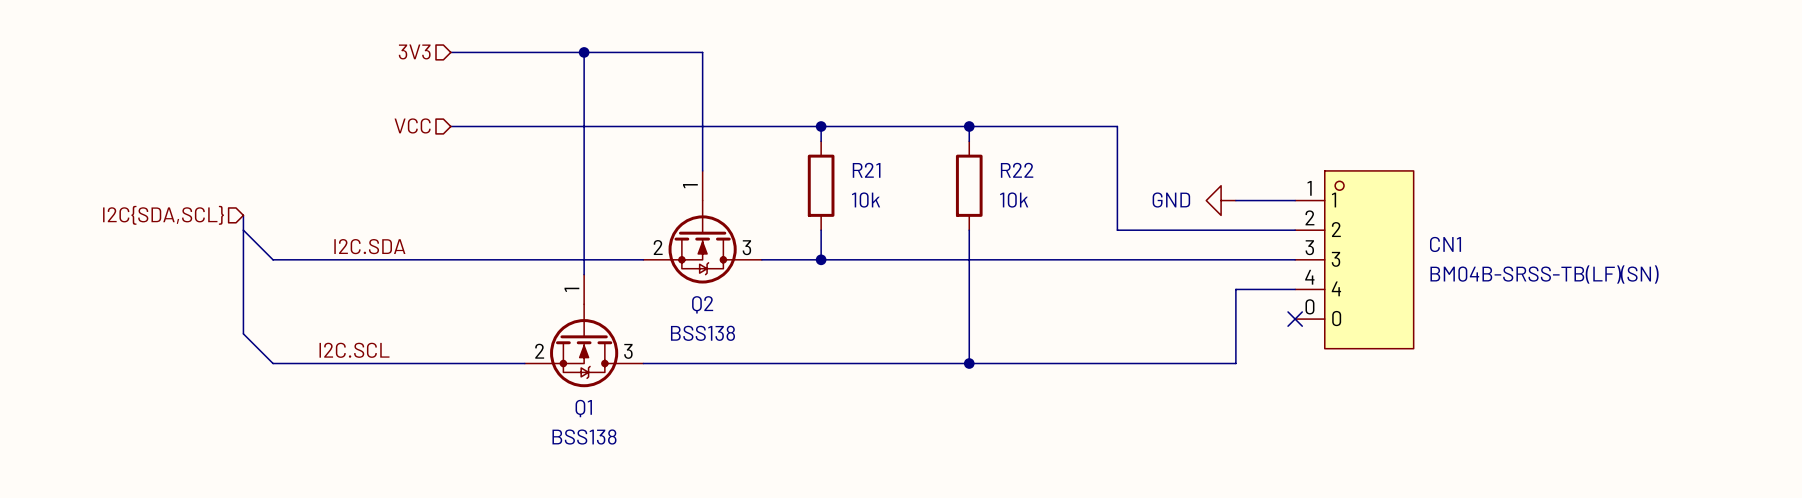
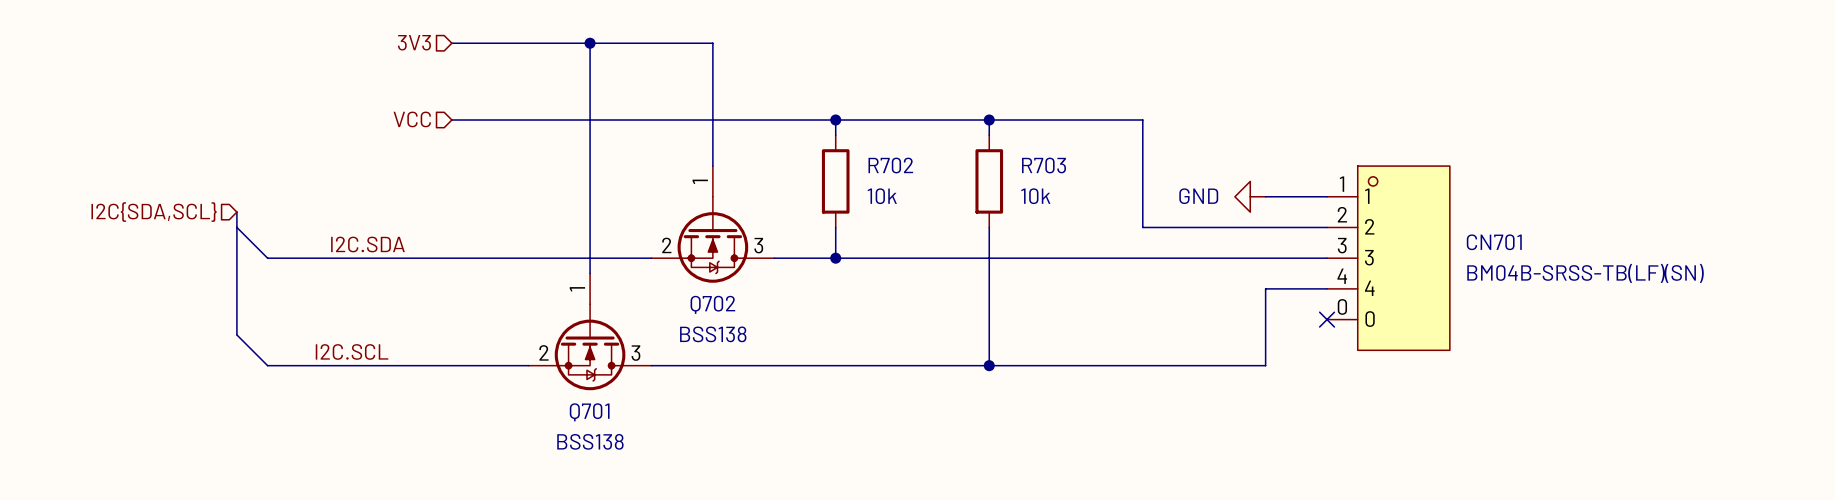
R21 name: R21 (866, 170) -> R702 (890, 165)
R22 name: R22 (1017, 170) -> R703 (1044, 165)
CN1 name: CN1 (1445, 244) -> CN701 (1494, 242)
Q2 name: Q2 (702, 304) -> Q702 (712, 304)
Q1 name: Q1 (583, 408) -> Q701 (589, 412)

